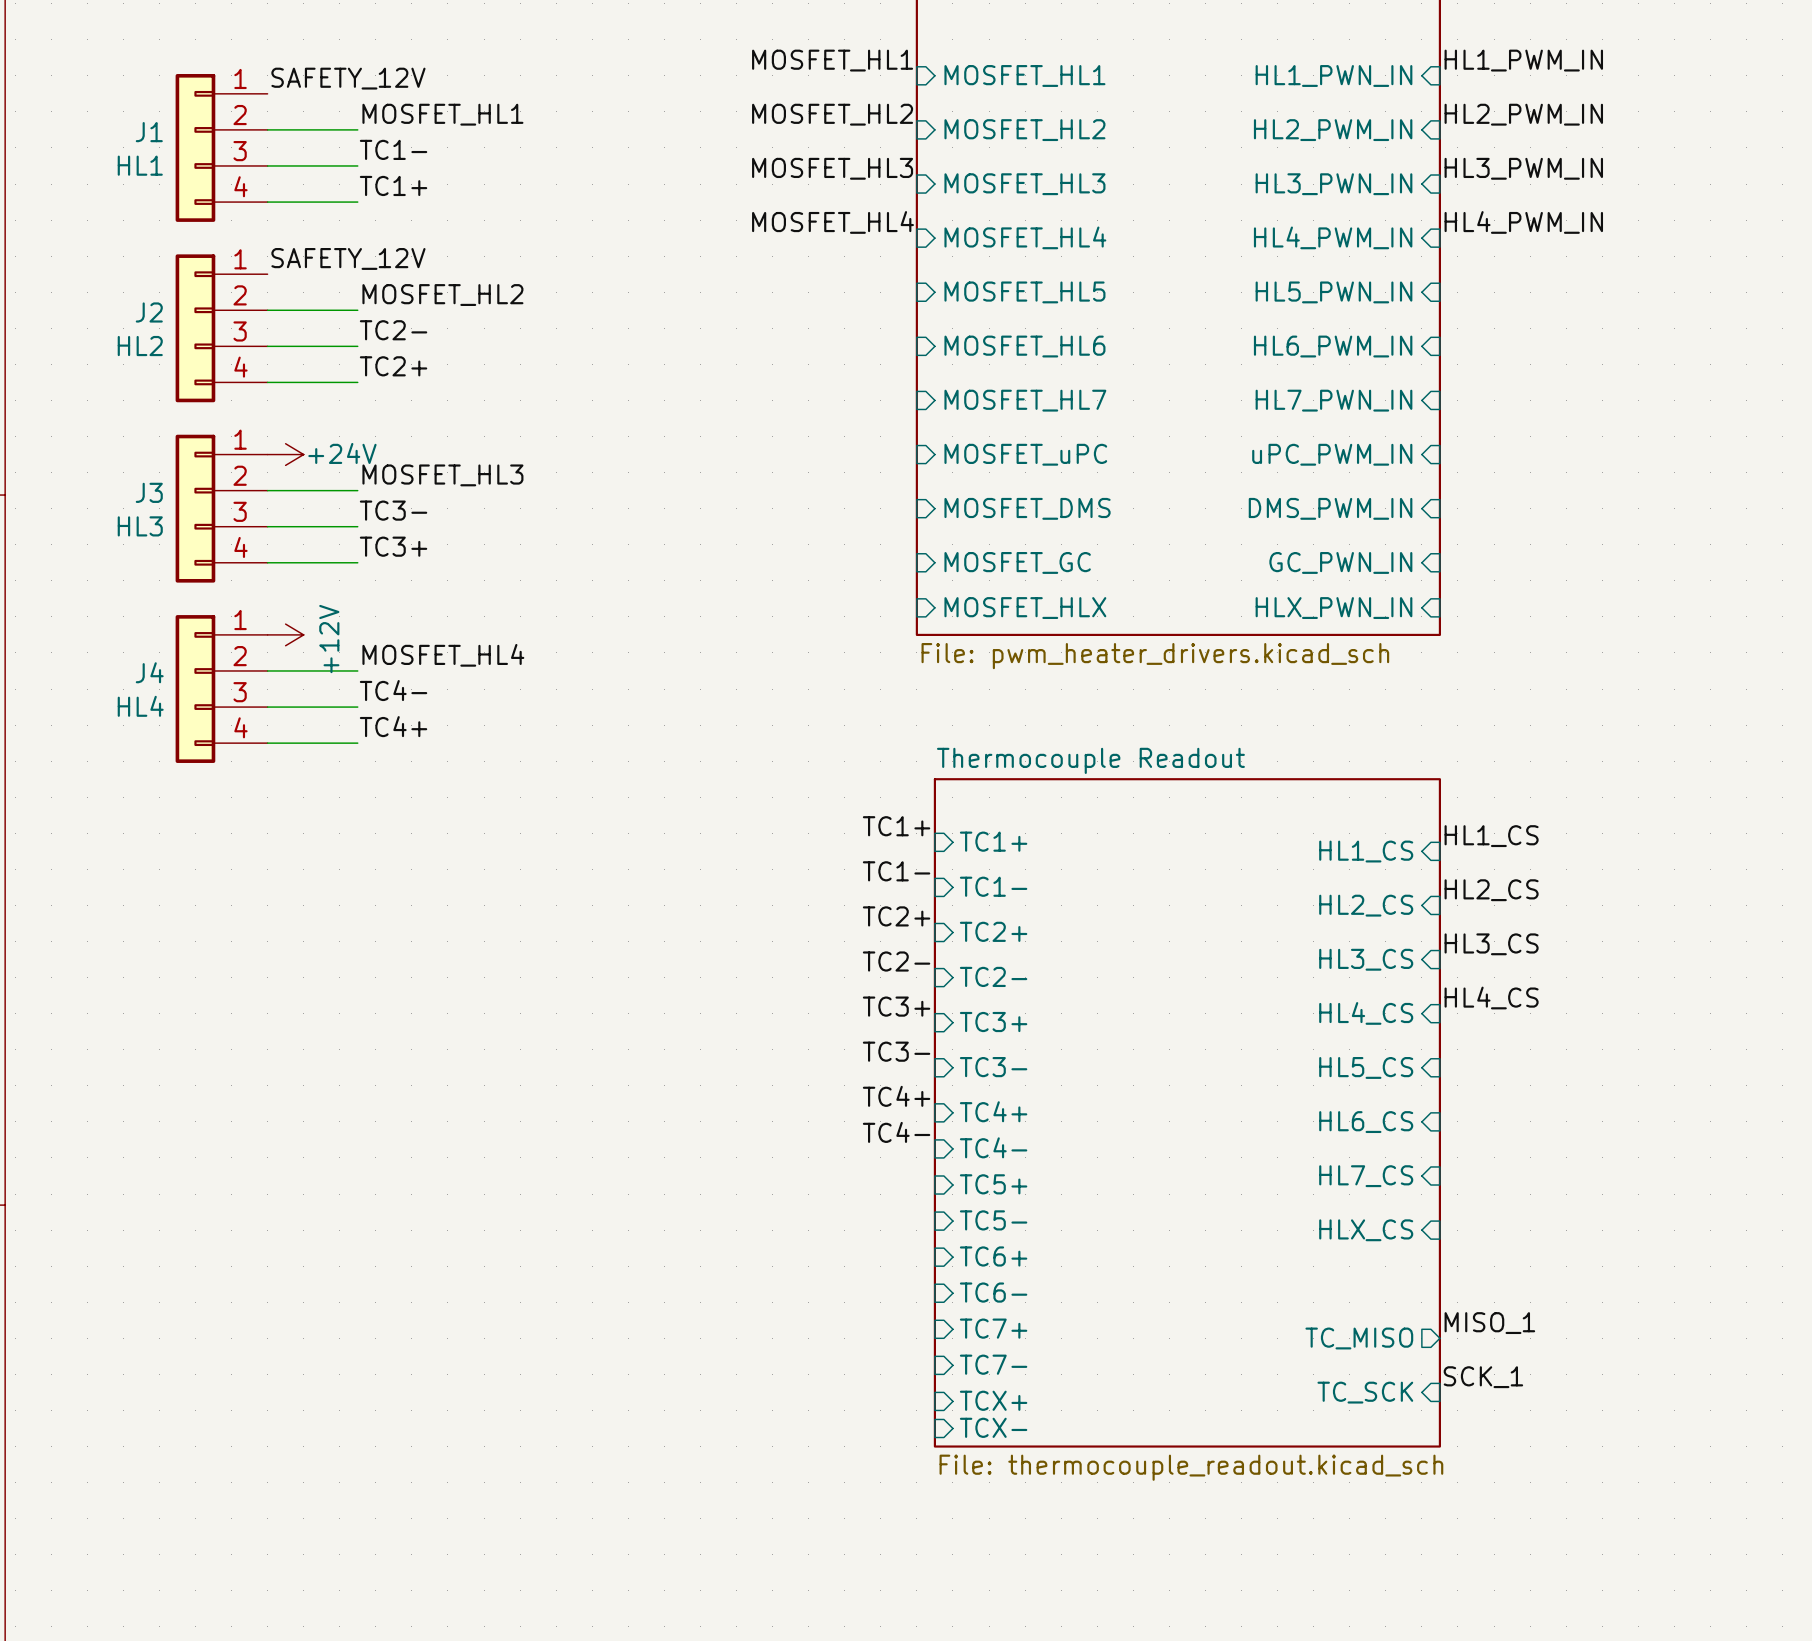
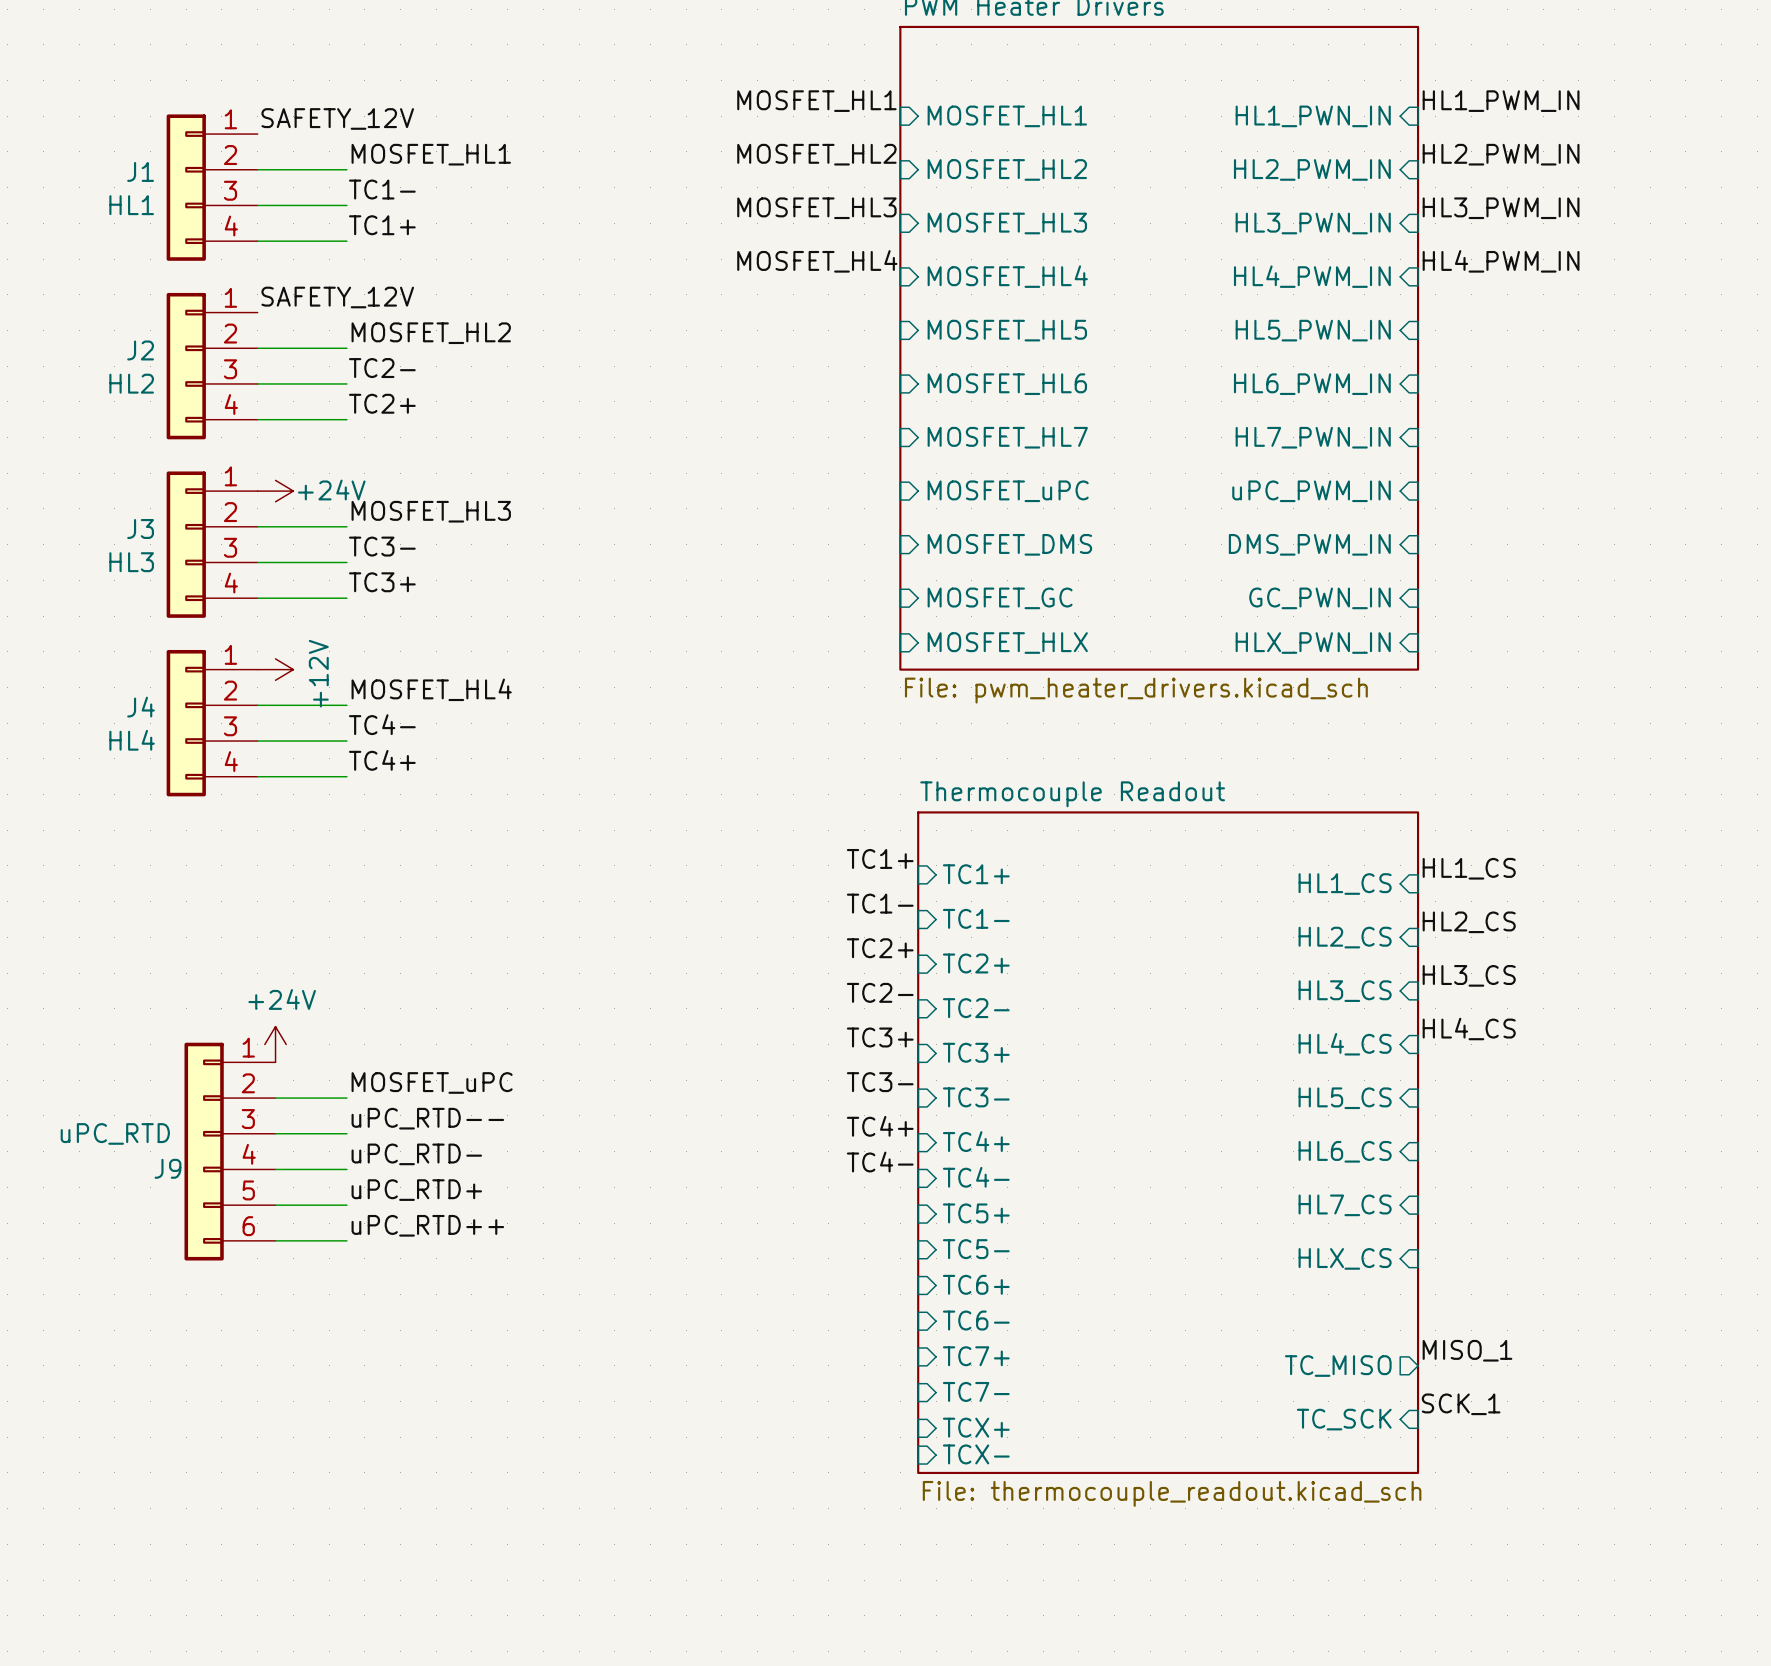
power symbol: none -> +24V (275, 1044)
label: none -> MOSFET_uPC (432, 1082)
wire: none -> (275, 1098) (346, 1098)
label: none -> uPC_RTD-- (427, 1118)
wire: none -> (275, 1133) (346, 1133)
J9: none -> uPC_RTD (230, 1151)
label: none -> uPC_RTD- (416, 1154)
wire: none -> (275, 1169) (346, 1169)
label: none -> uPC_RTD+ (416, 1190)
wire: none -> (275, 1205) (346, 1205)
label: none -> uPC_RTD++ (427, 1225)
wire: none -> (275, 1240) (346, 1240)

